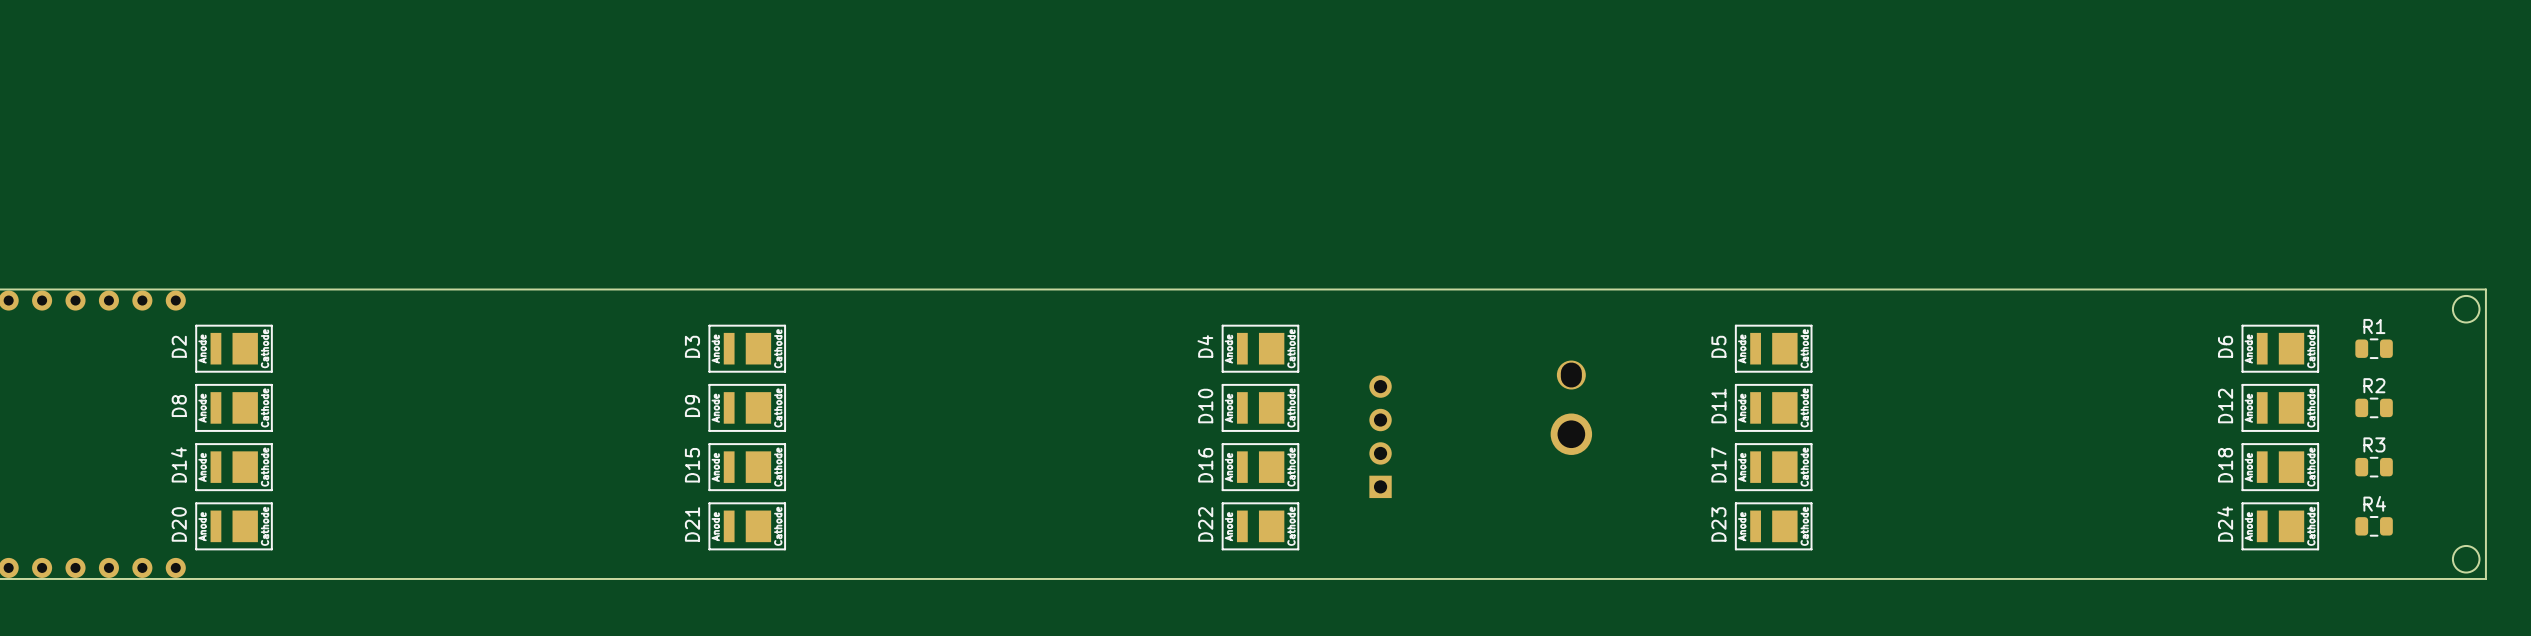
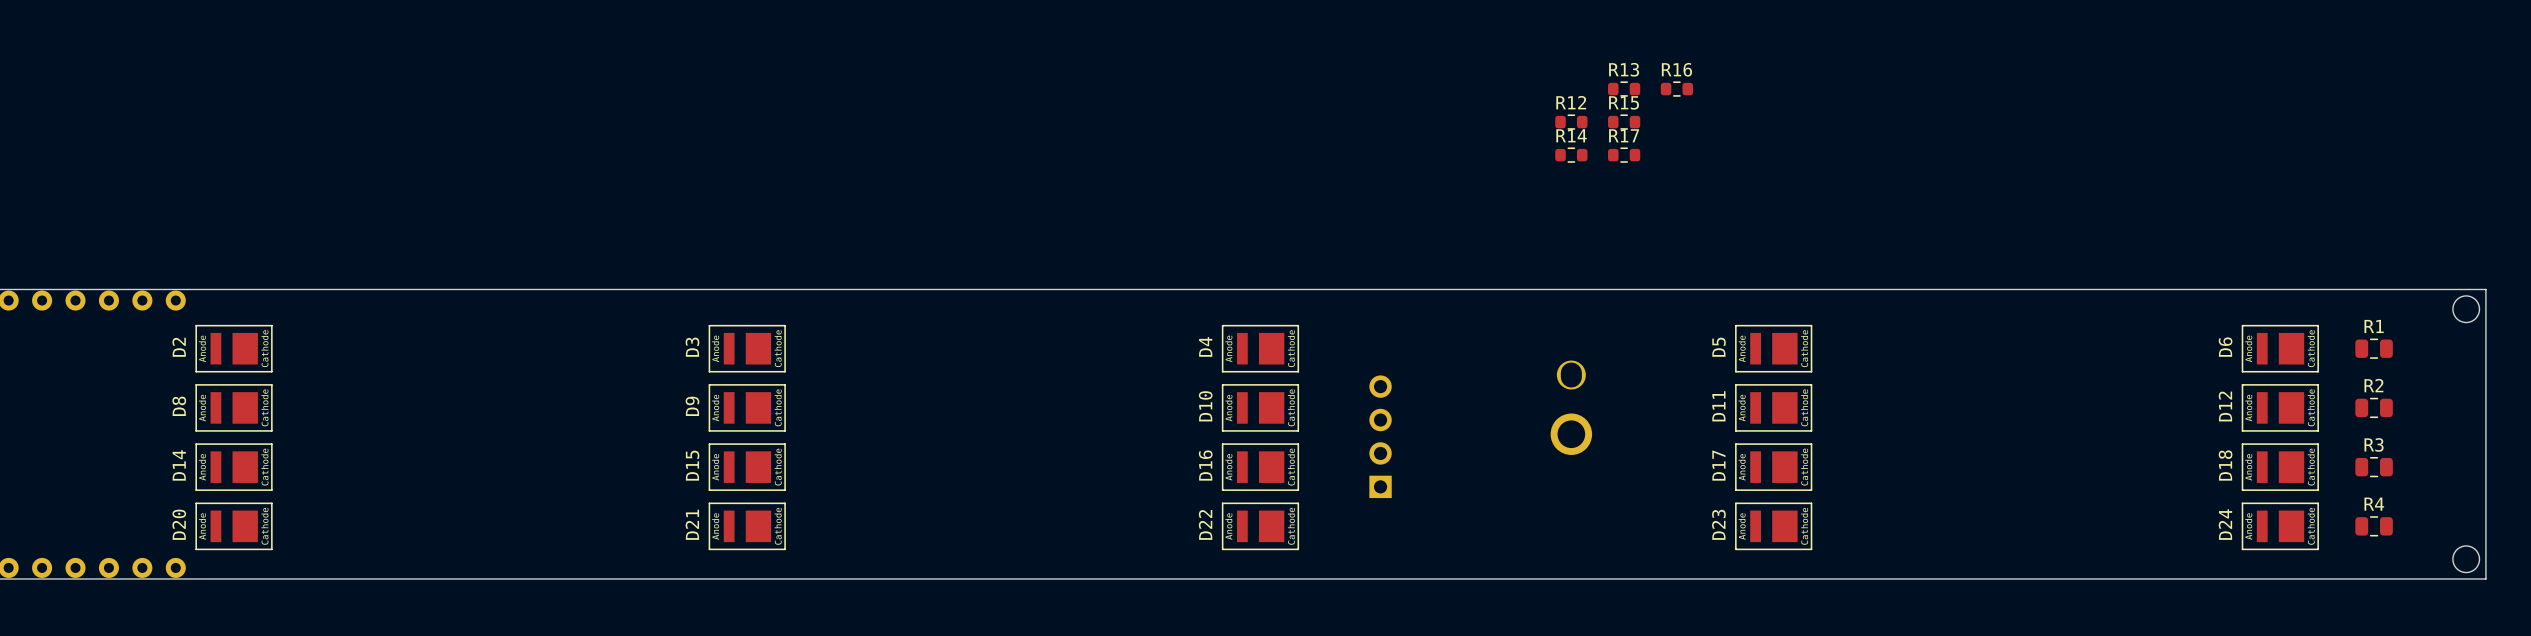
R13: none -> (1624, 89)
R16: none -> (1676, 89)
R12: none -> (1571, 122)
R15: none -> (1624, 122)
R14: none -> (1571, 155)
R17: none -> (1624, 155)

